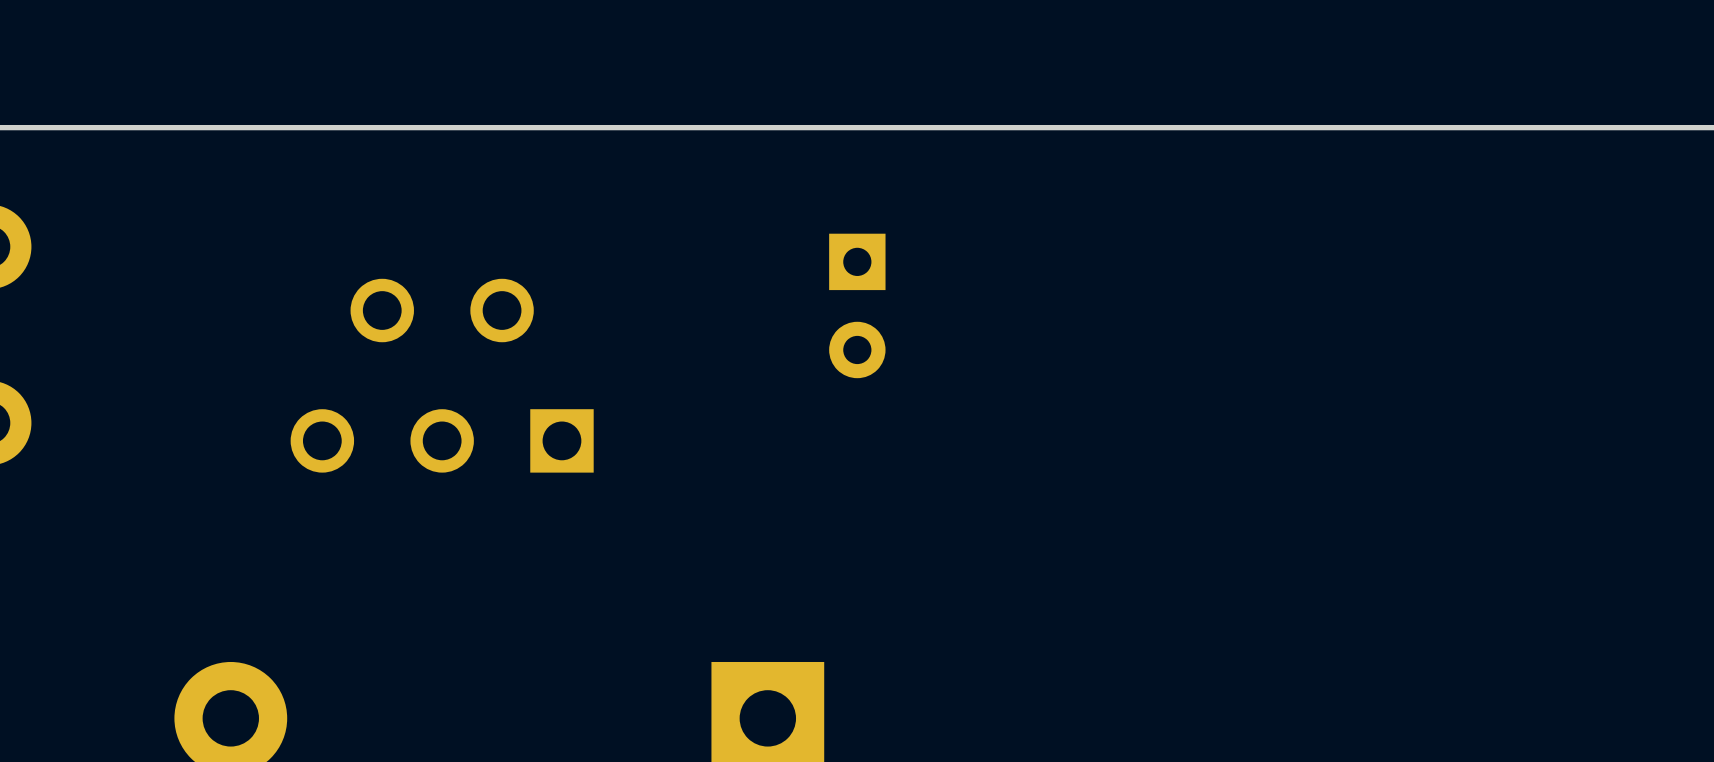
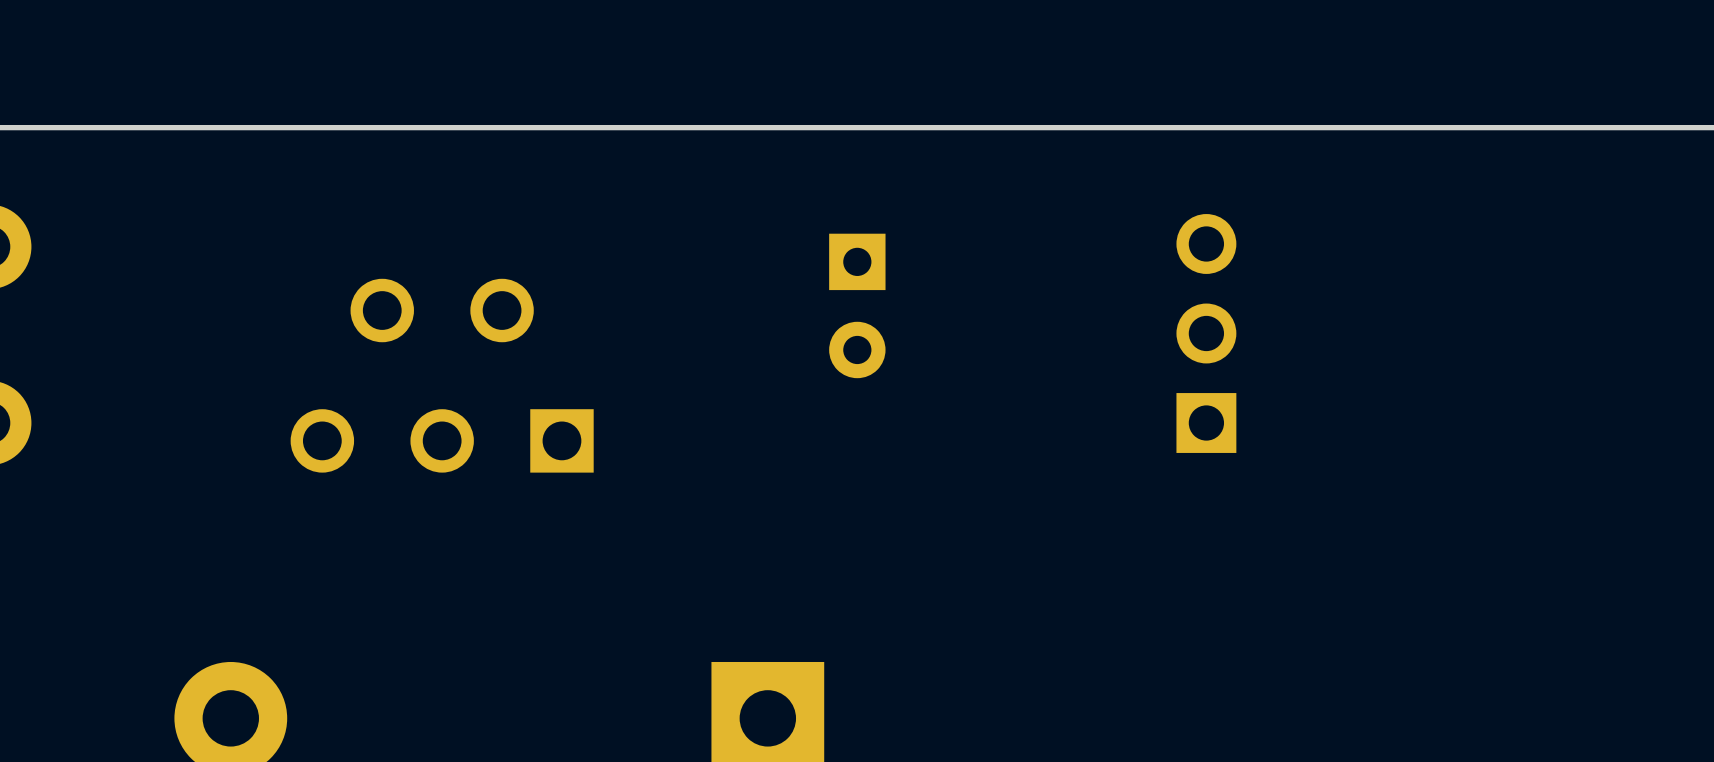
part: none -> (1206, 333)

